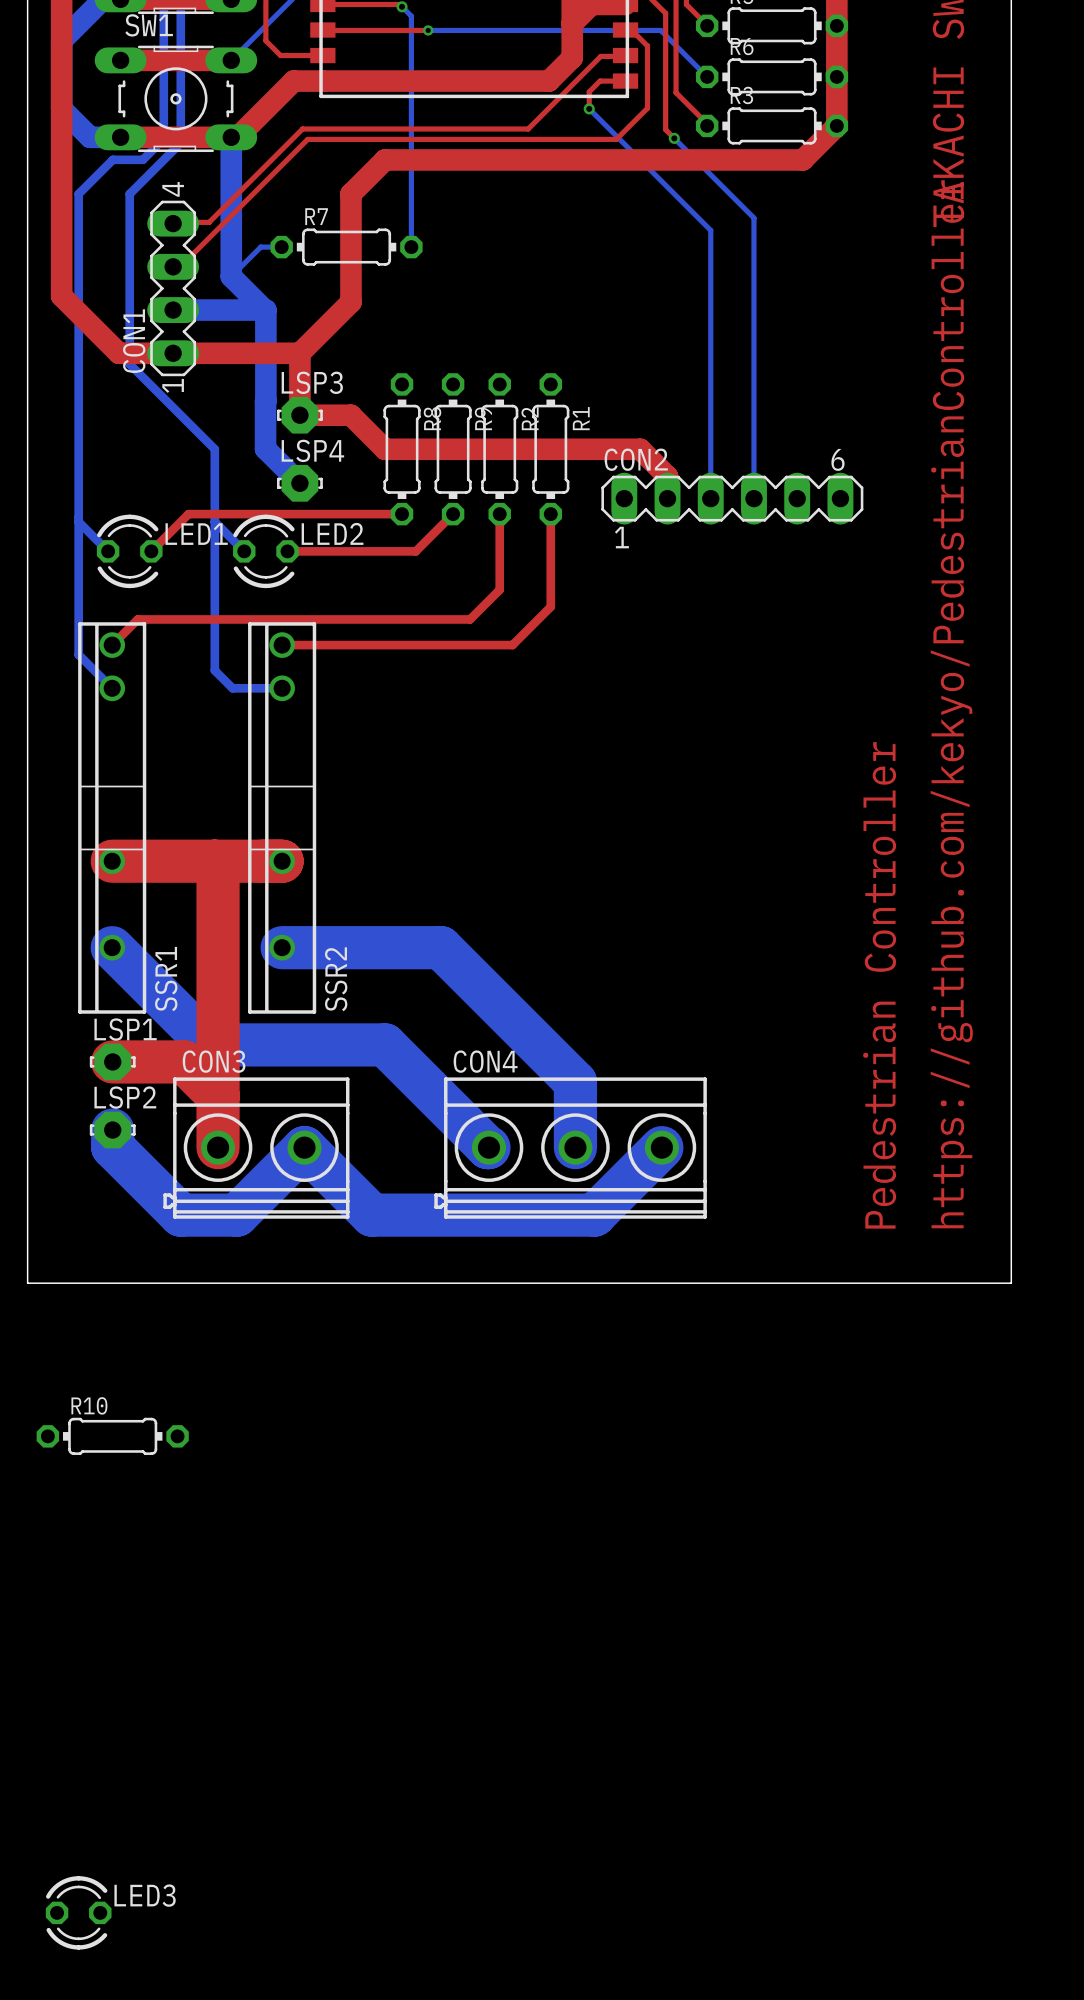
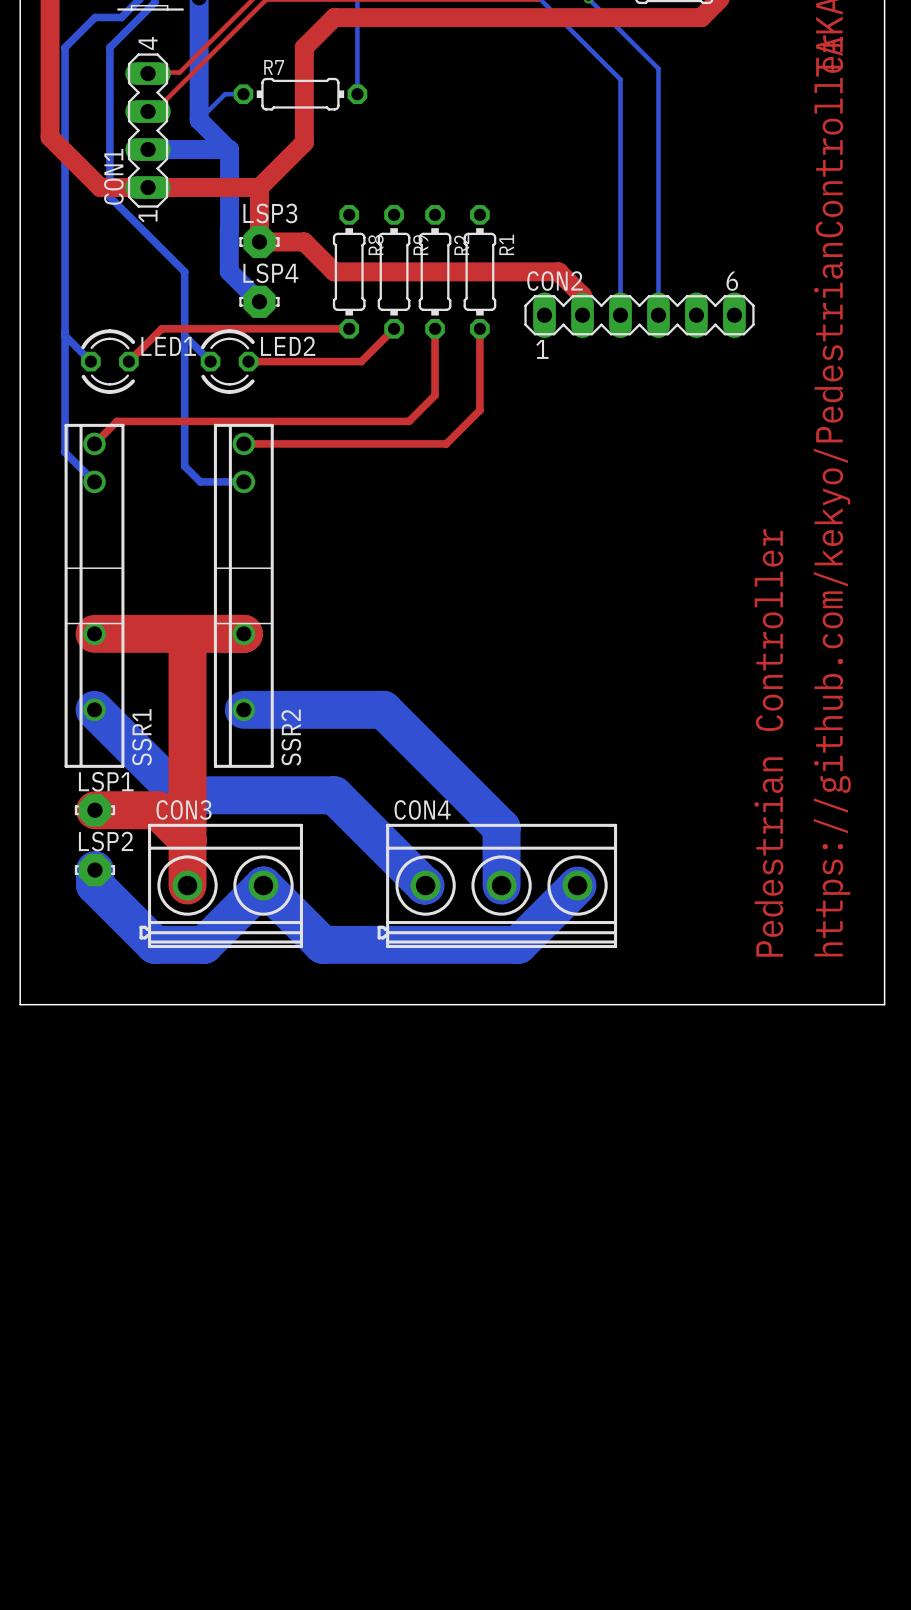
R10: (112, 1436) -> none
LED3: (78, 1912) -> none

